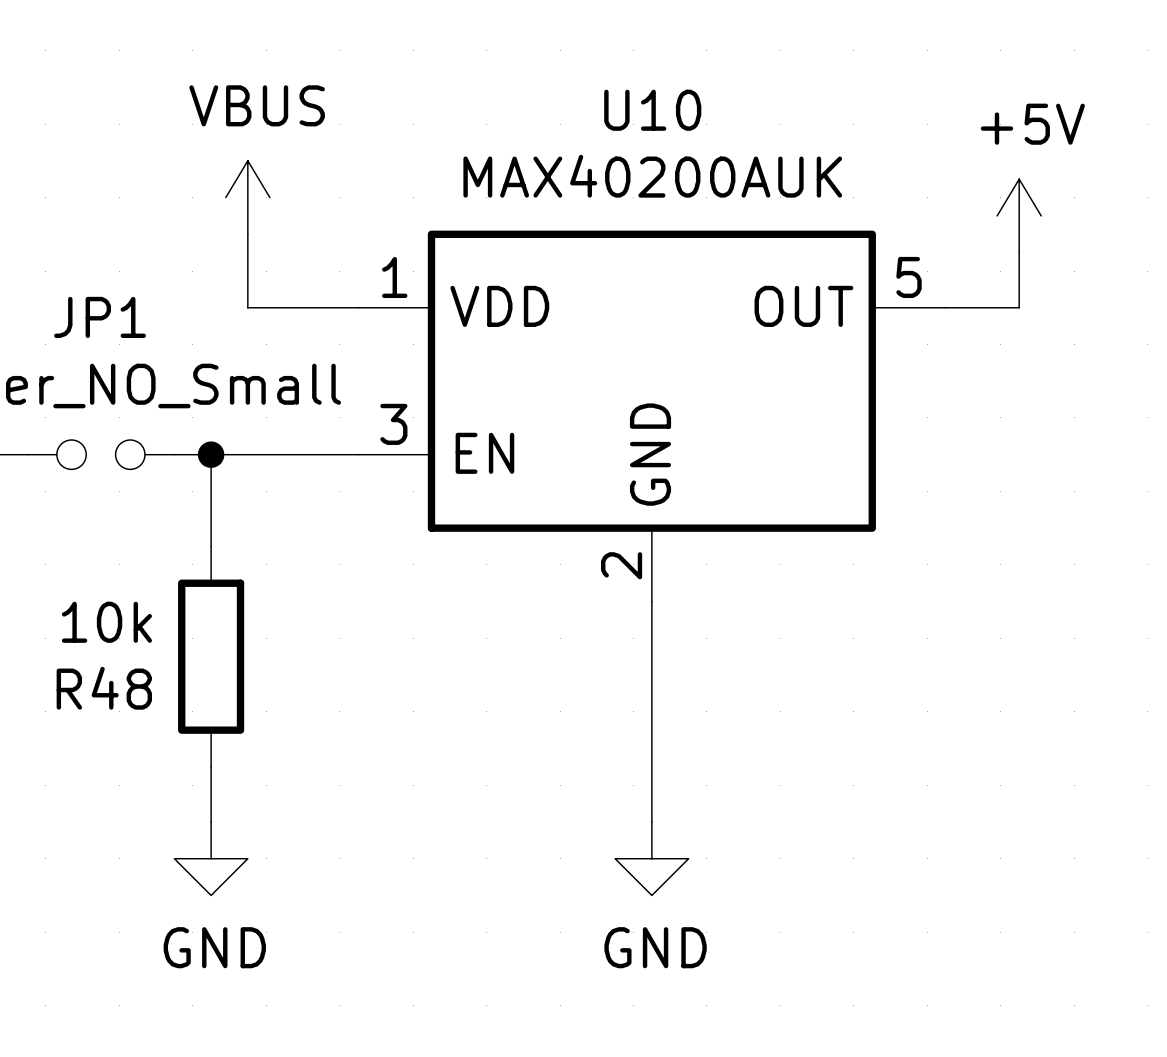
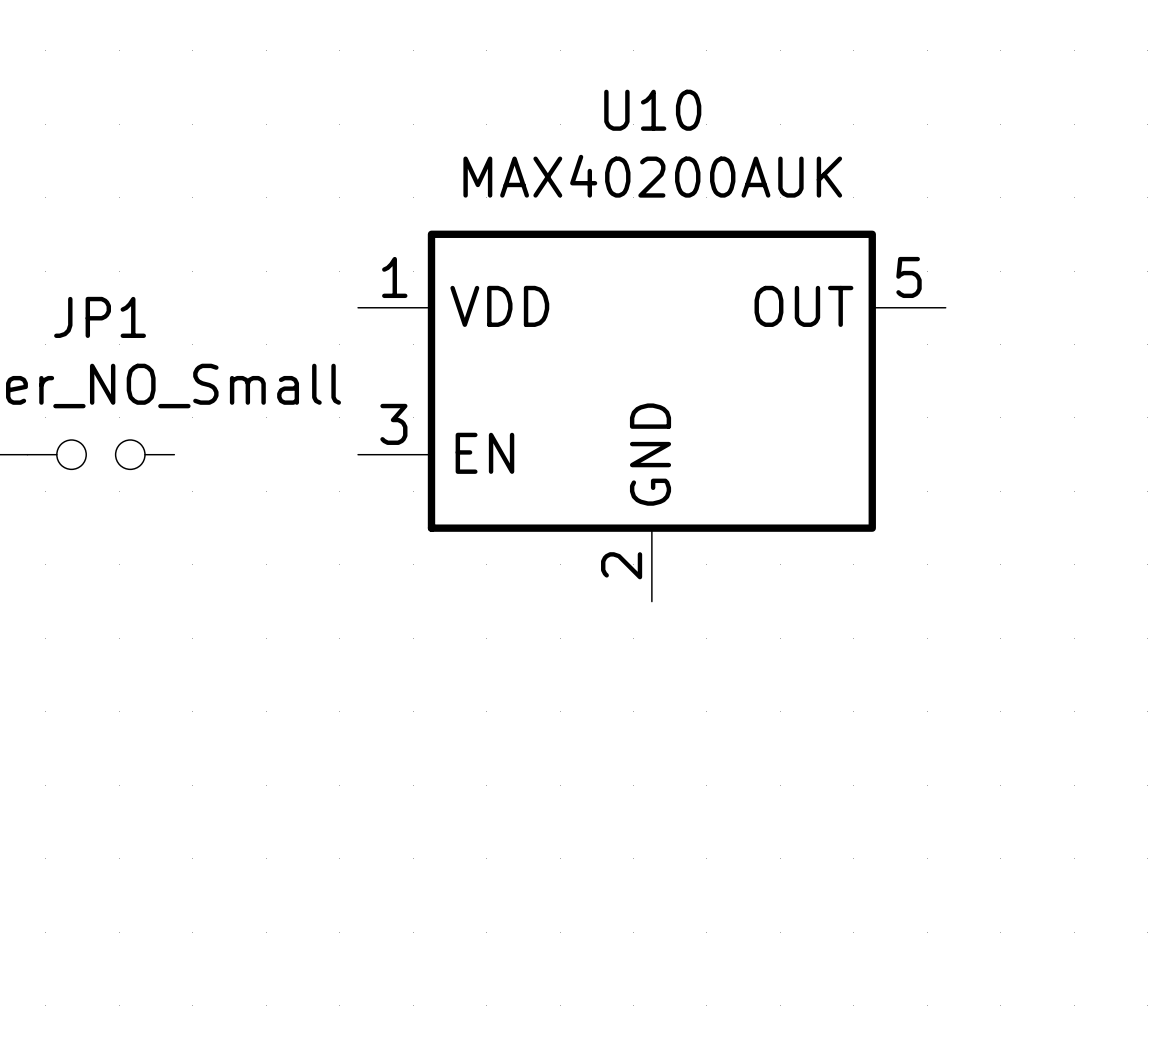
power symbol: VBUS (247, 197) -> none
power symbol: +5V (1019, 215) -> none
wire: (247, 234) (247, 307) (358, 307) -> none
wire: (1019, 252) (1019, 307) (945, 307) -> none
wire: (174, 454) (358, 454) -> none
wire: (211, 454) (211, 546) -> none
junction: (211, 454) -> none
wire: (651, 601) (651, 821) -> none
R48: 10k (211, 656) -> none
wire: (211, 766) (211, 821) -> none
power symbol: GND (211, 858) -> none
power symbol: GND (651, 858) -> none

